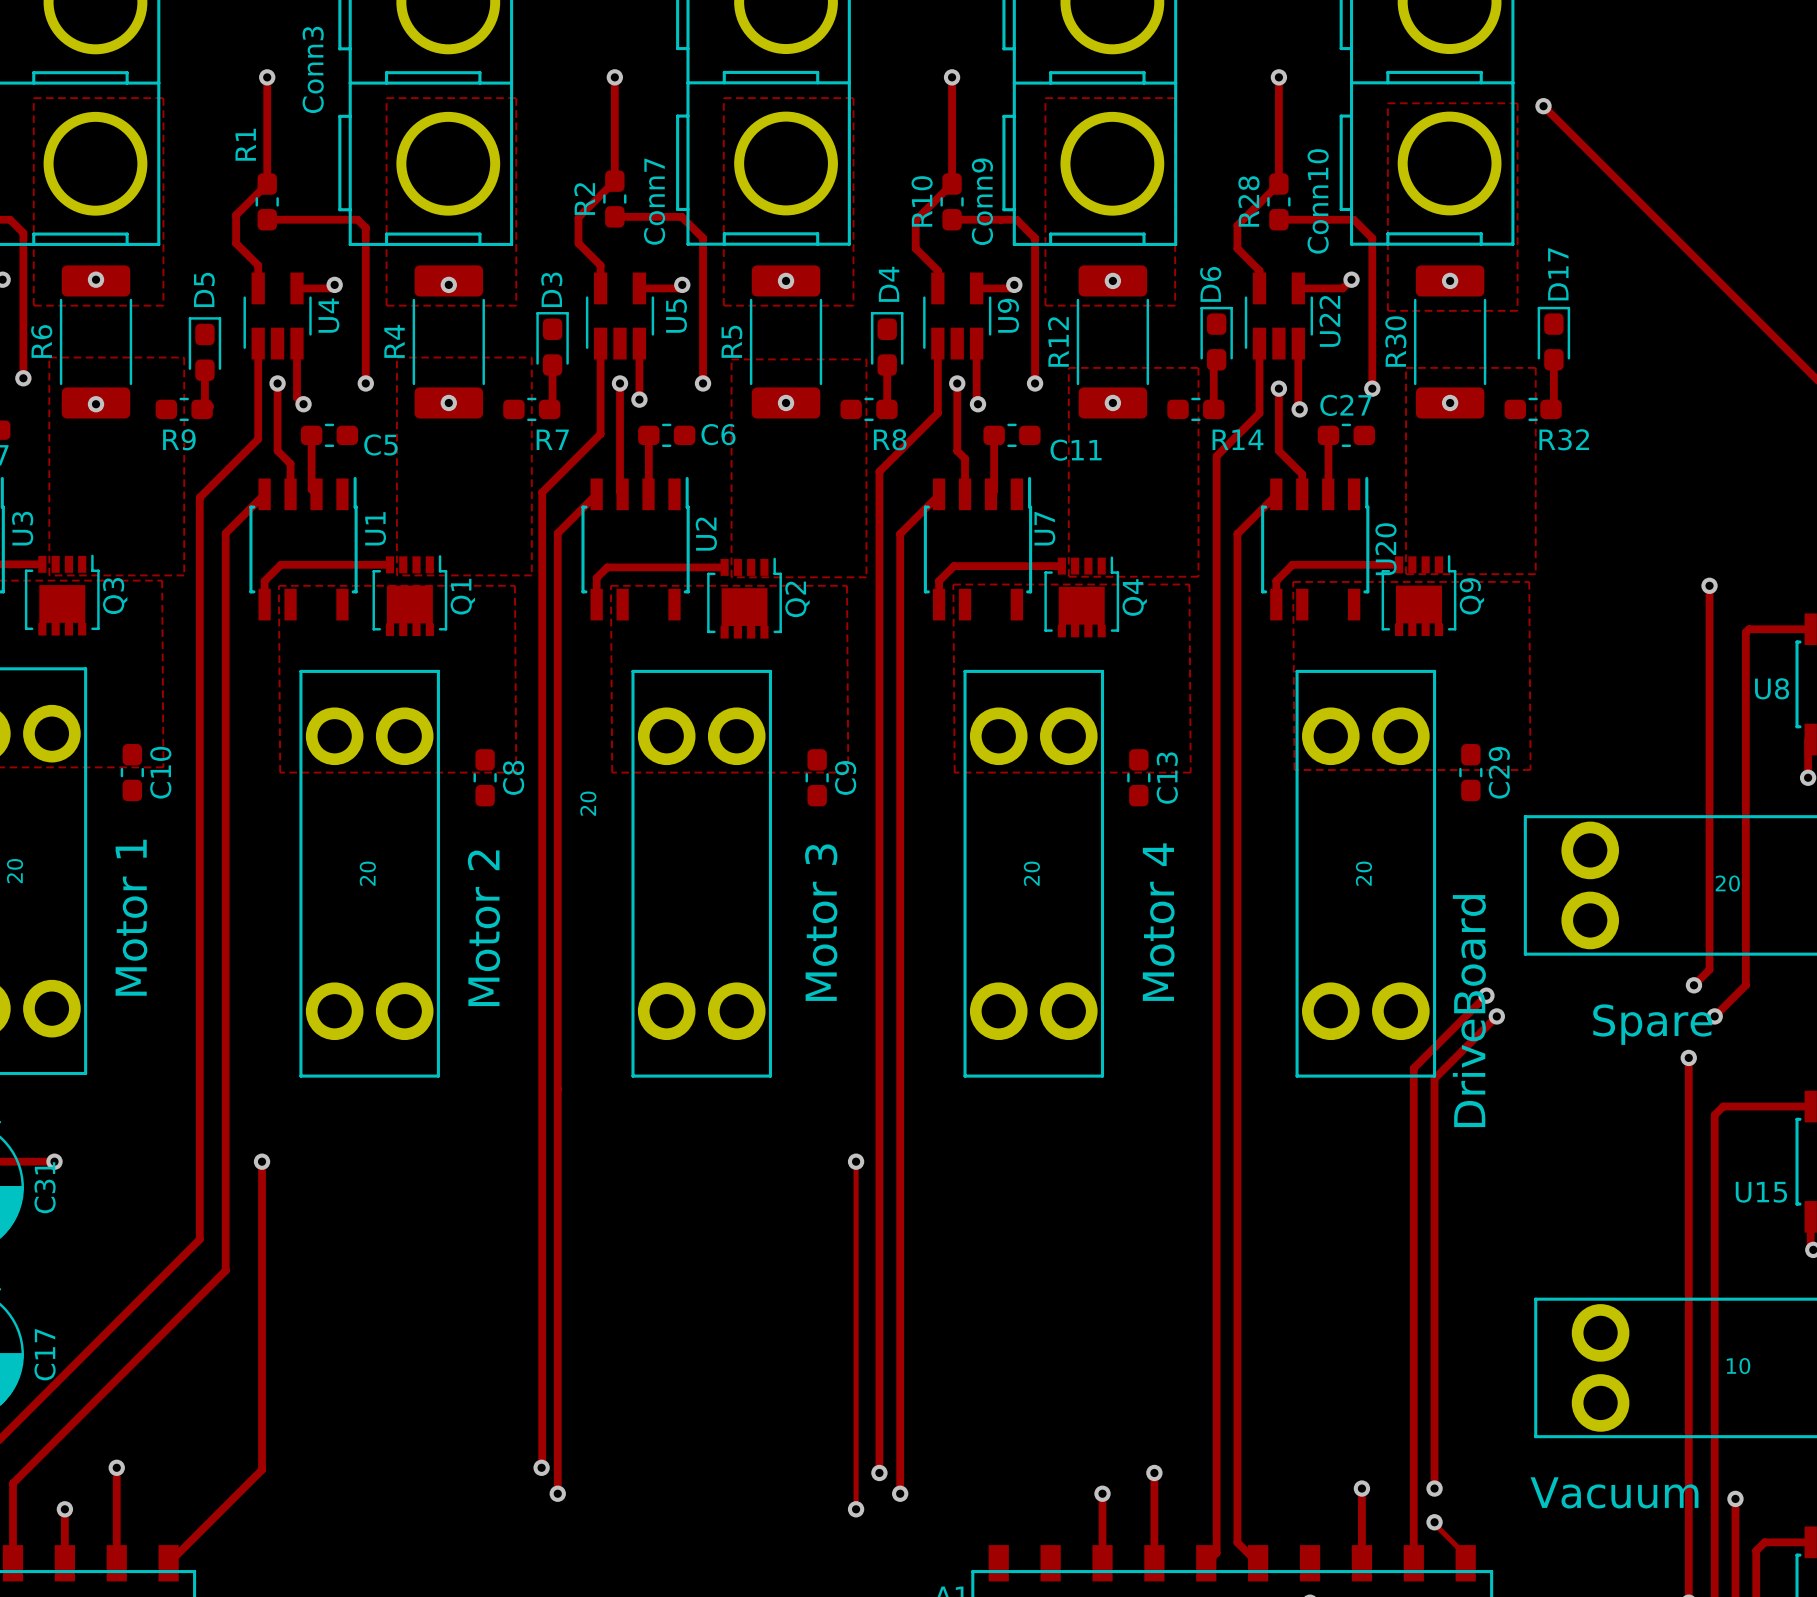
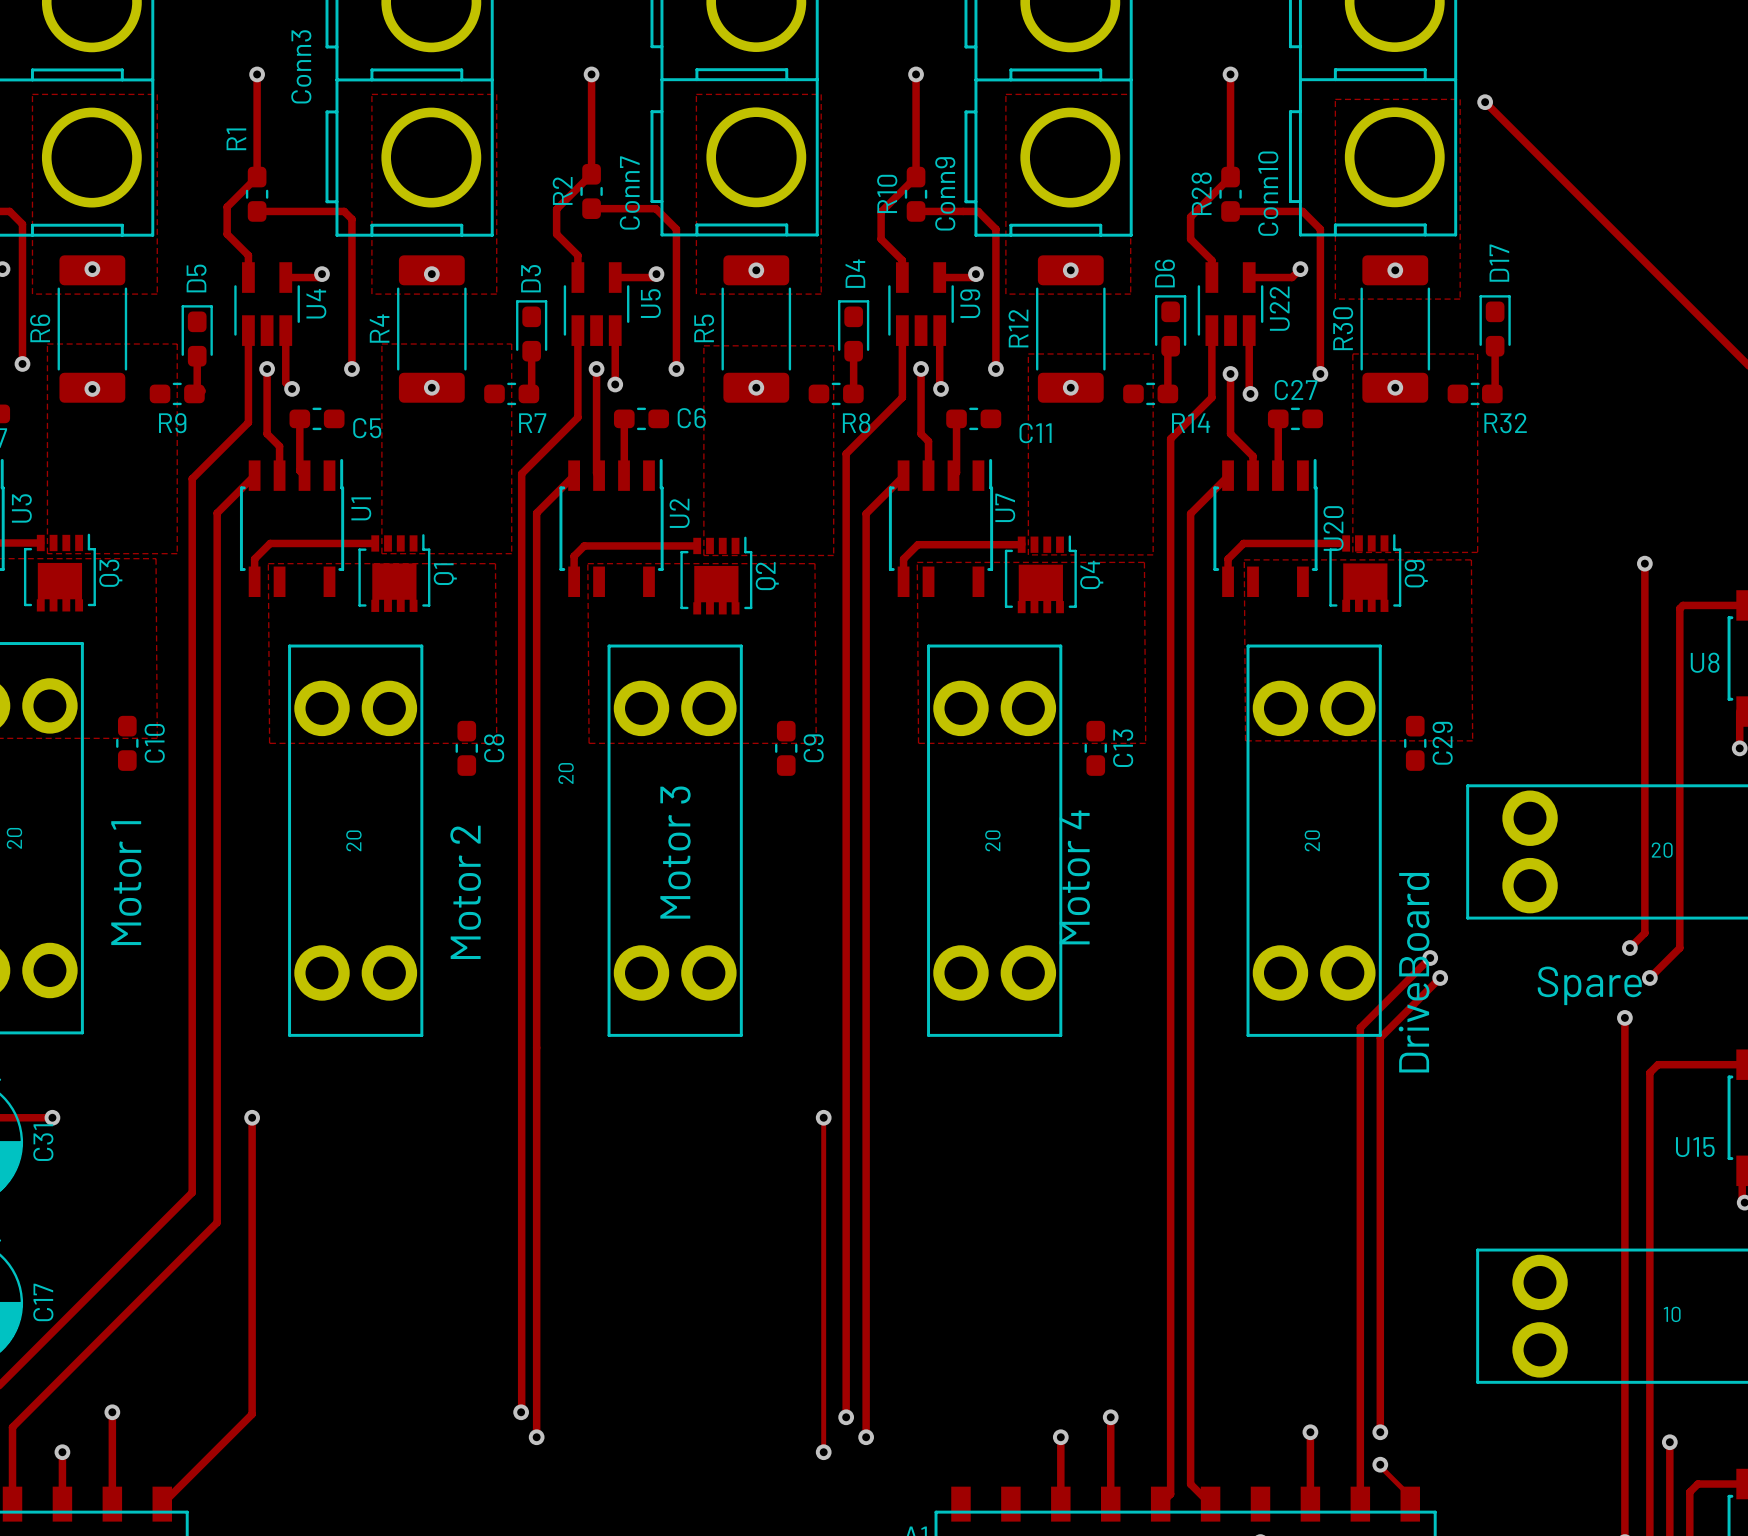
text position: Motor 3 (821, 922) -> Motor 3 (675, 852)
text position: Motor 4 (1158, 922) -> Motor 4 (1074, 877)
text: Vacuum (1614, 1492) -> none

